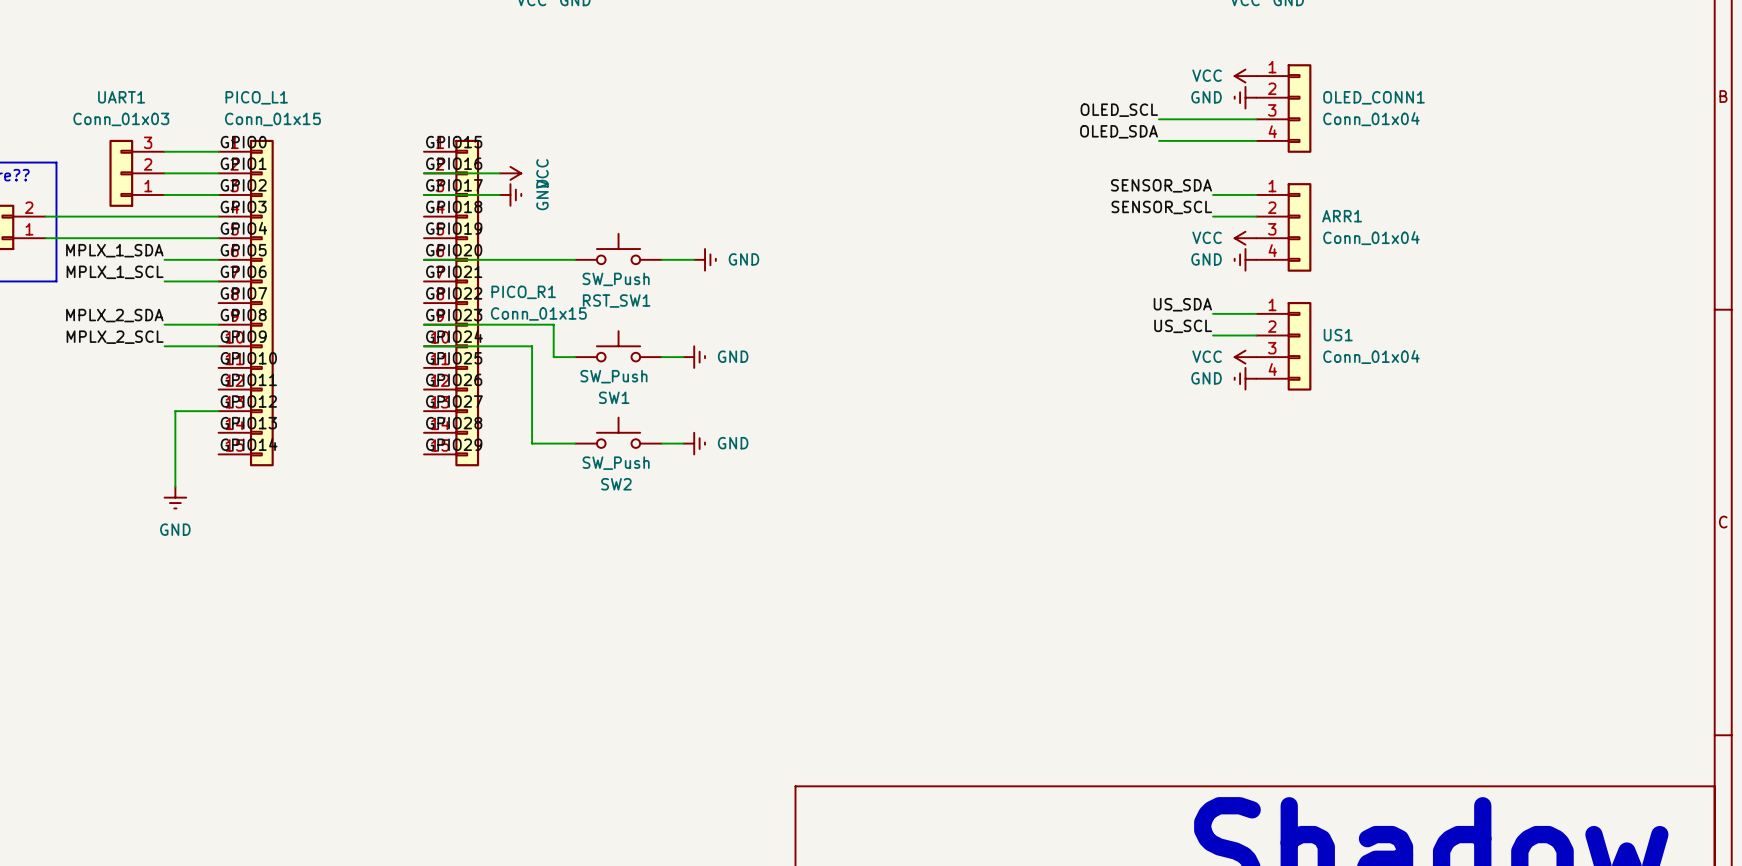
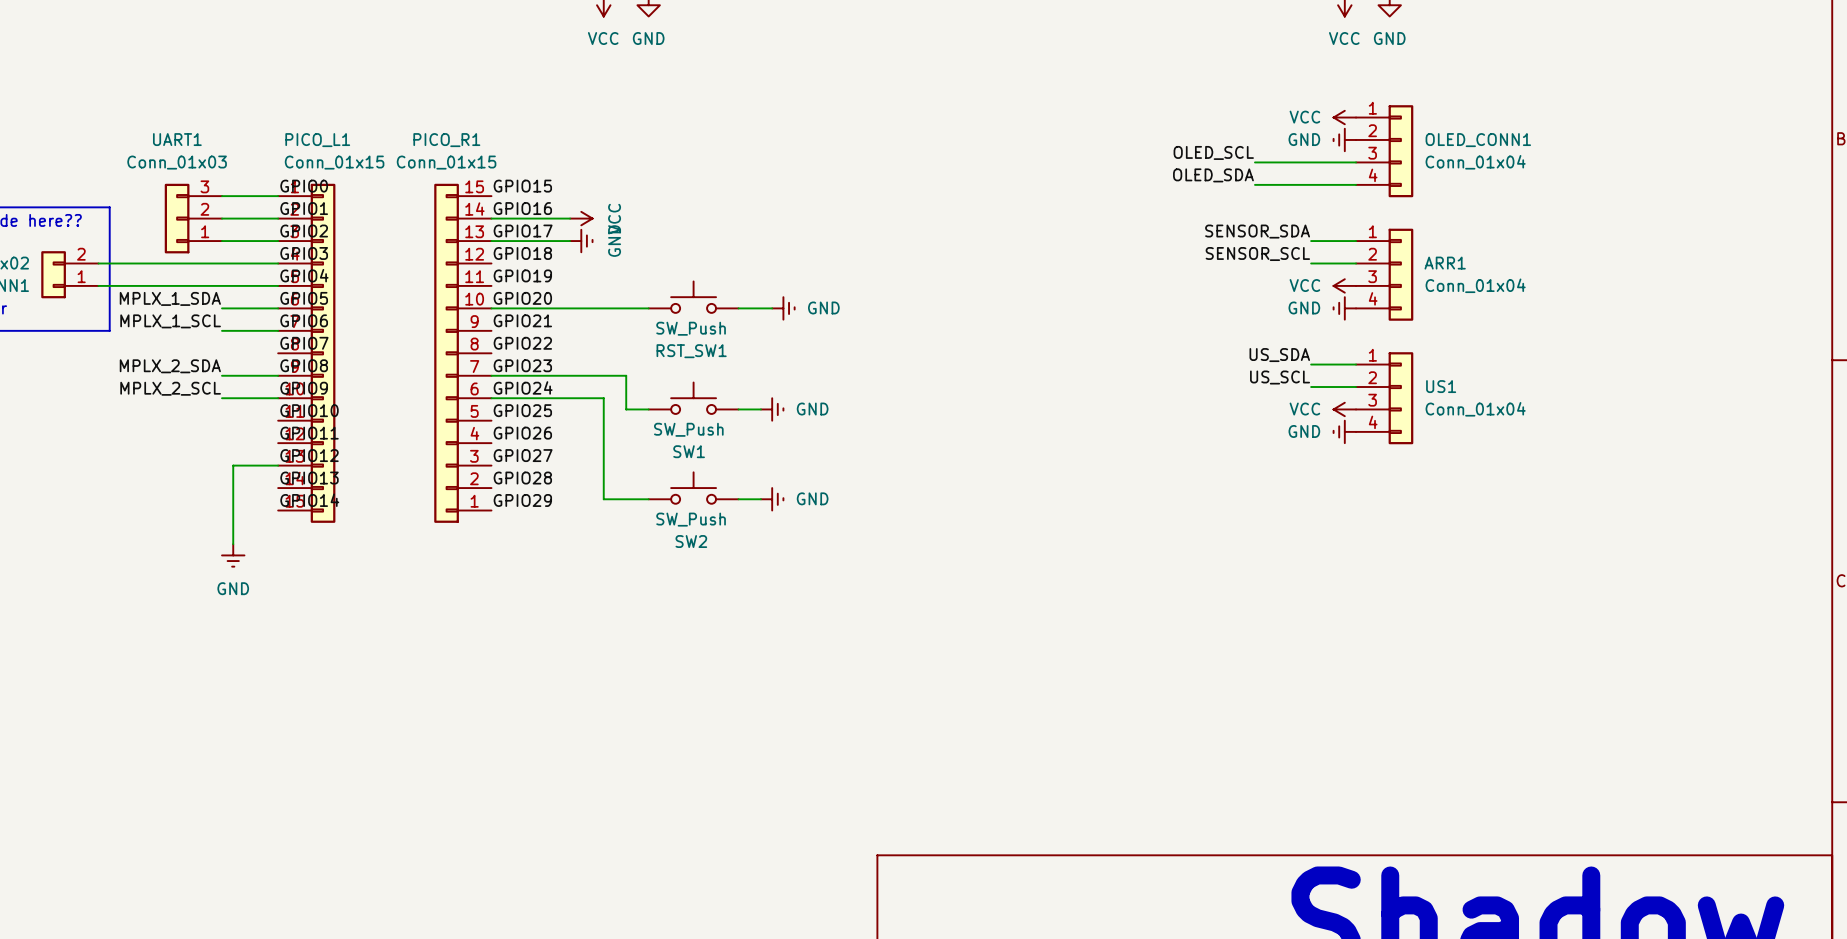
PICO_R1 name position: PICO_R1 (523, 292) -> PICO_R1 (446, 140)
PICO_R1 rotation: 0° (467, 303) -> 180° (446, 353)
PICO_R1 value position: Conn_01x15 (538, 313) -> Conn_01x15 (446, 162)

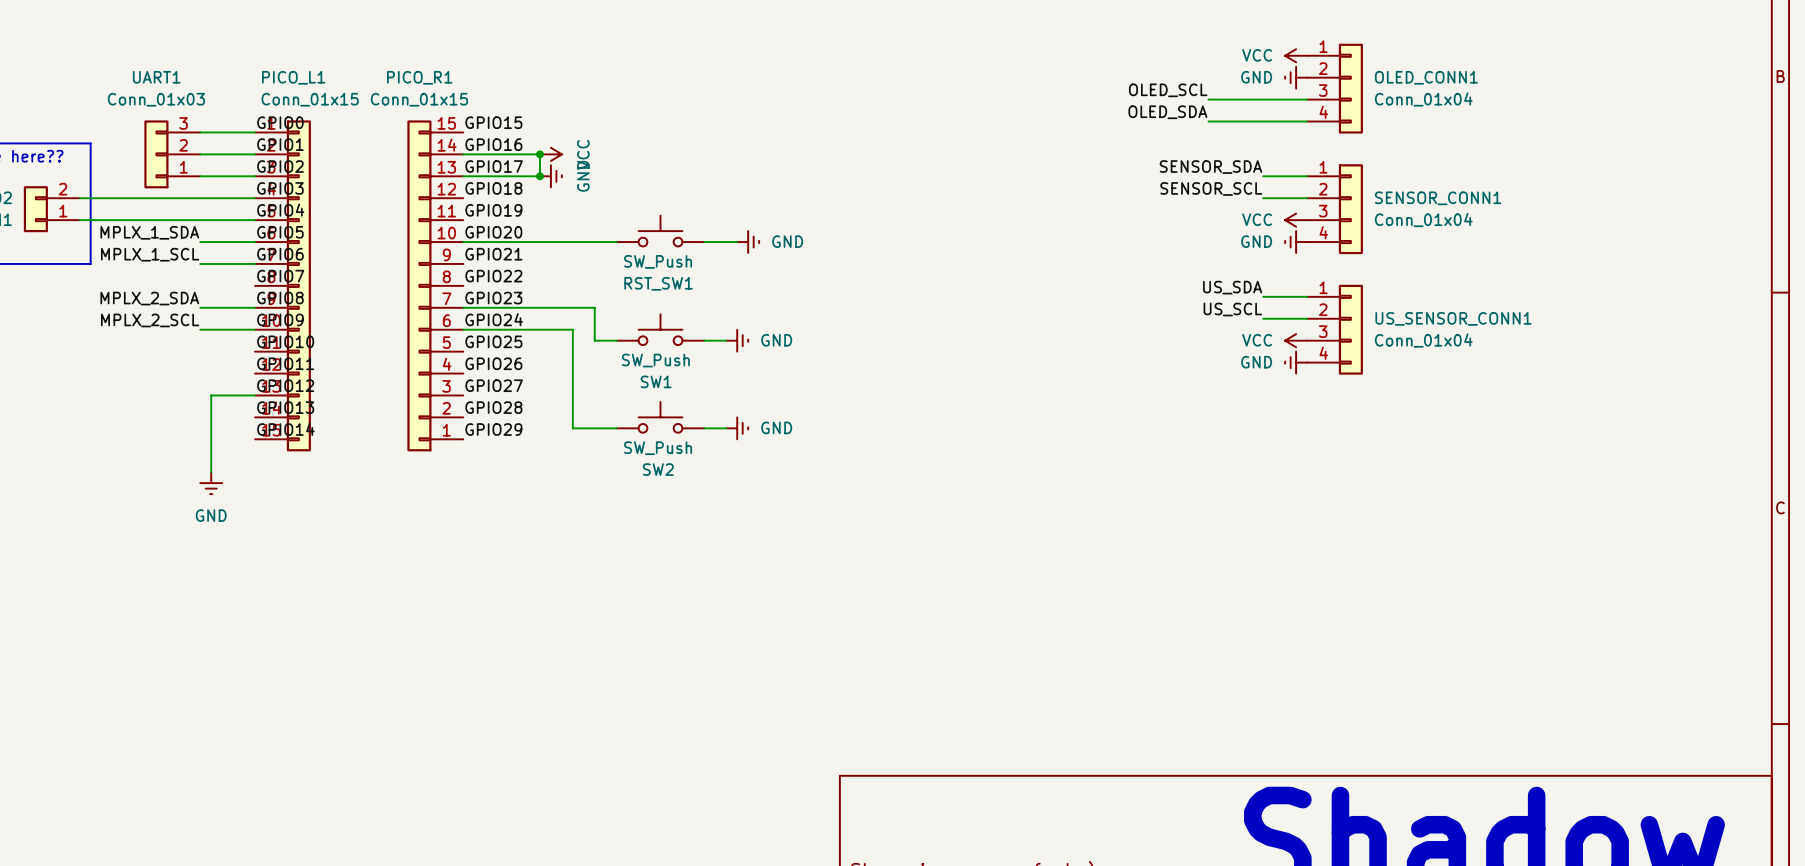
wire: none -> (539, 154) (539, 176)
junction: none -> (539, 154)
junction: none -> (539, 176)
ARR1 name: ARR1 (1445, 263) -> SENSOR_CONN1 (1438, 198)
US1 name: US1 (1441, 386) -> US_SENSOR_CONN1 (1453, 318)

